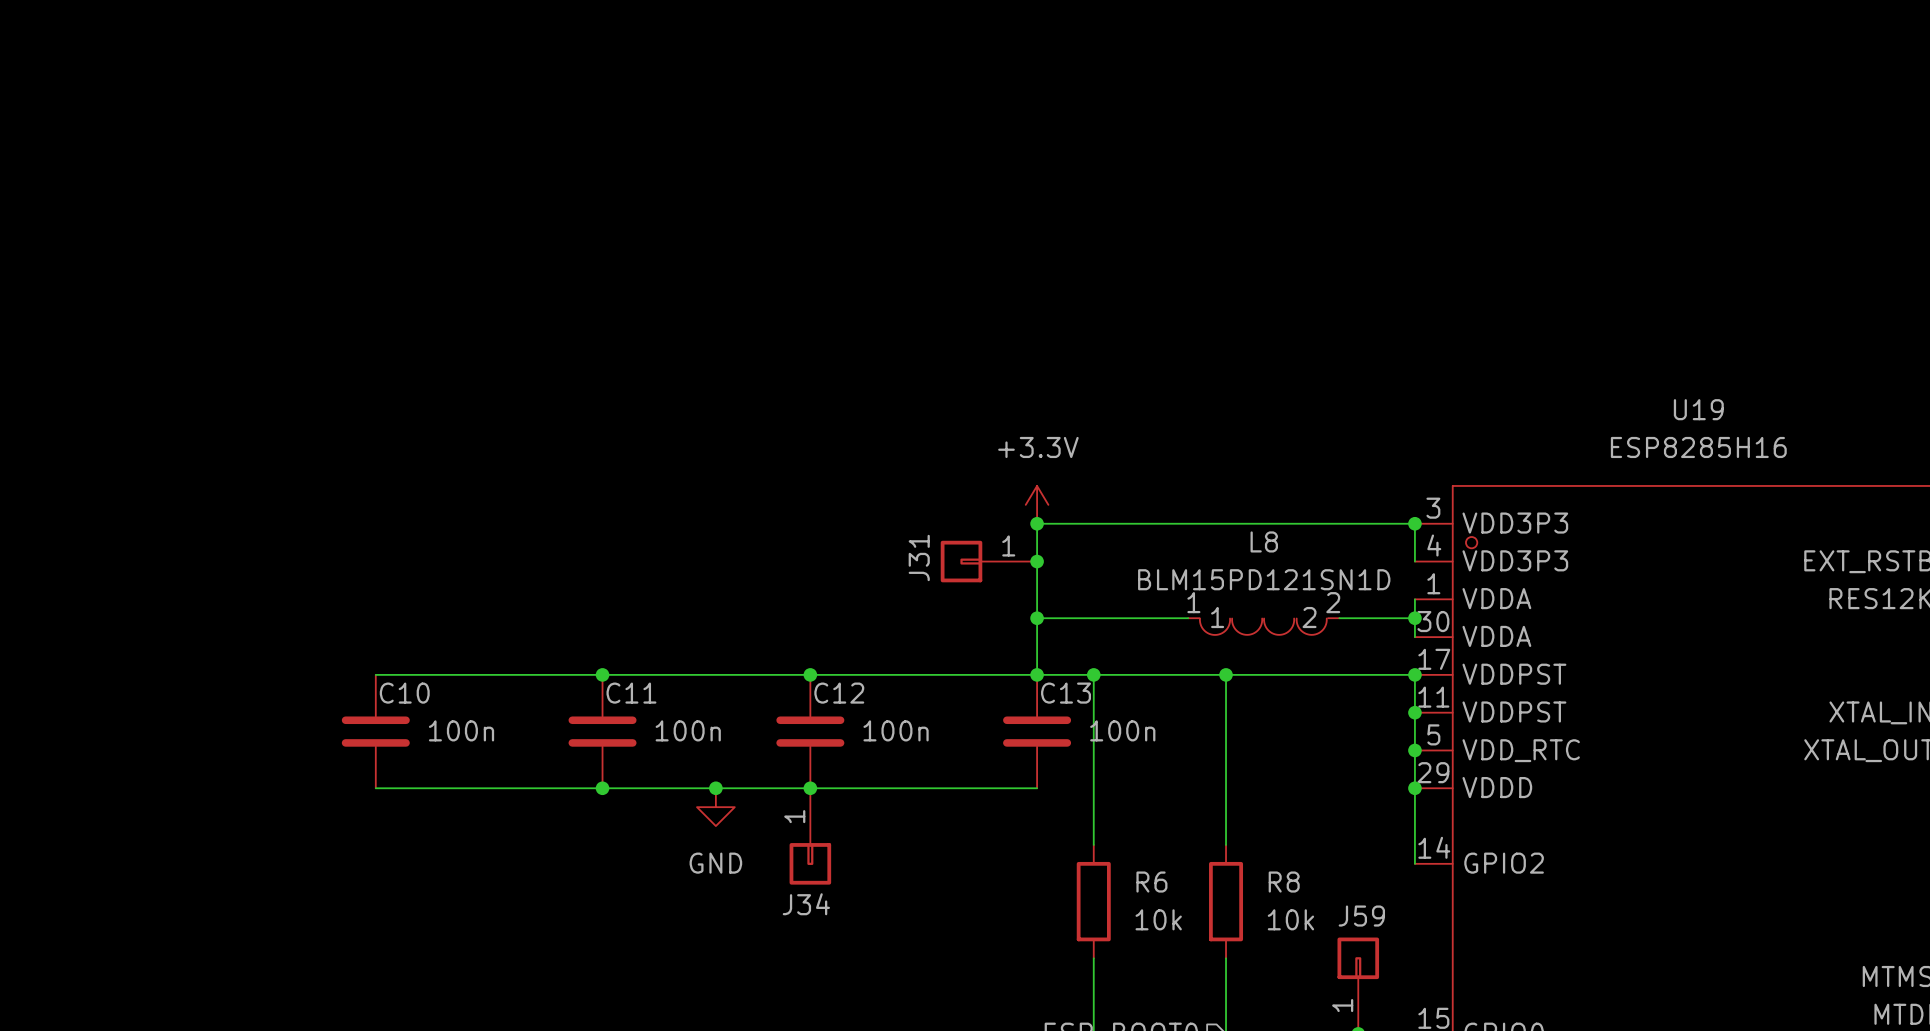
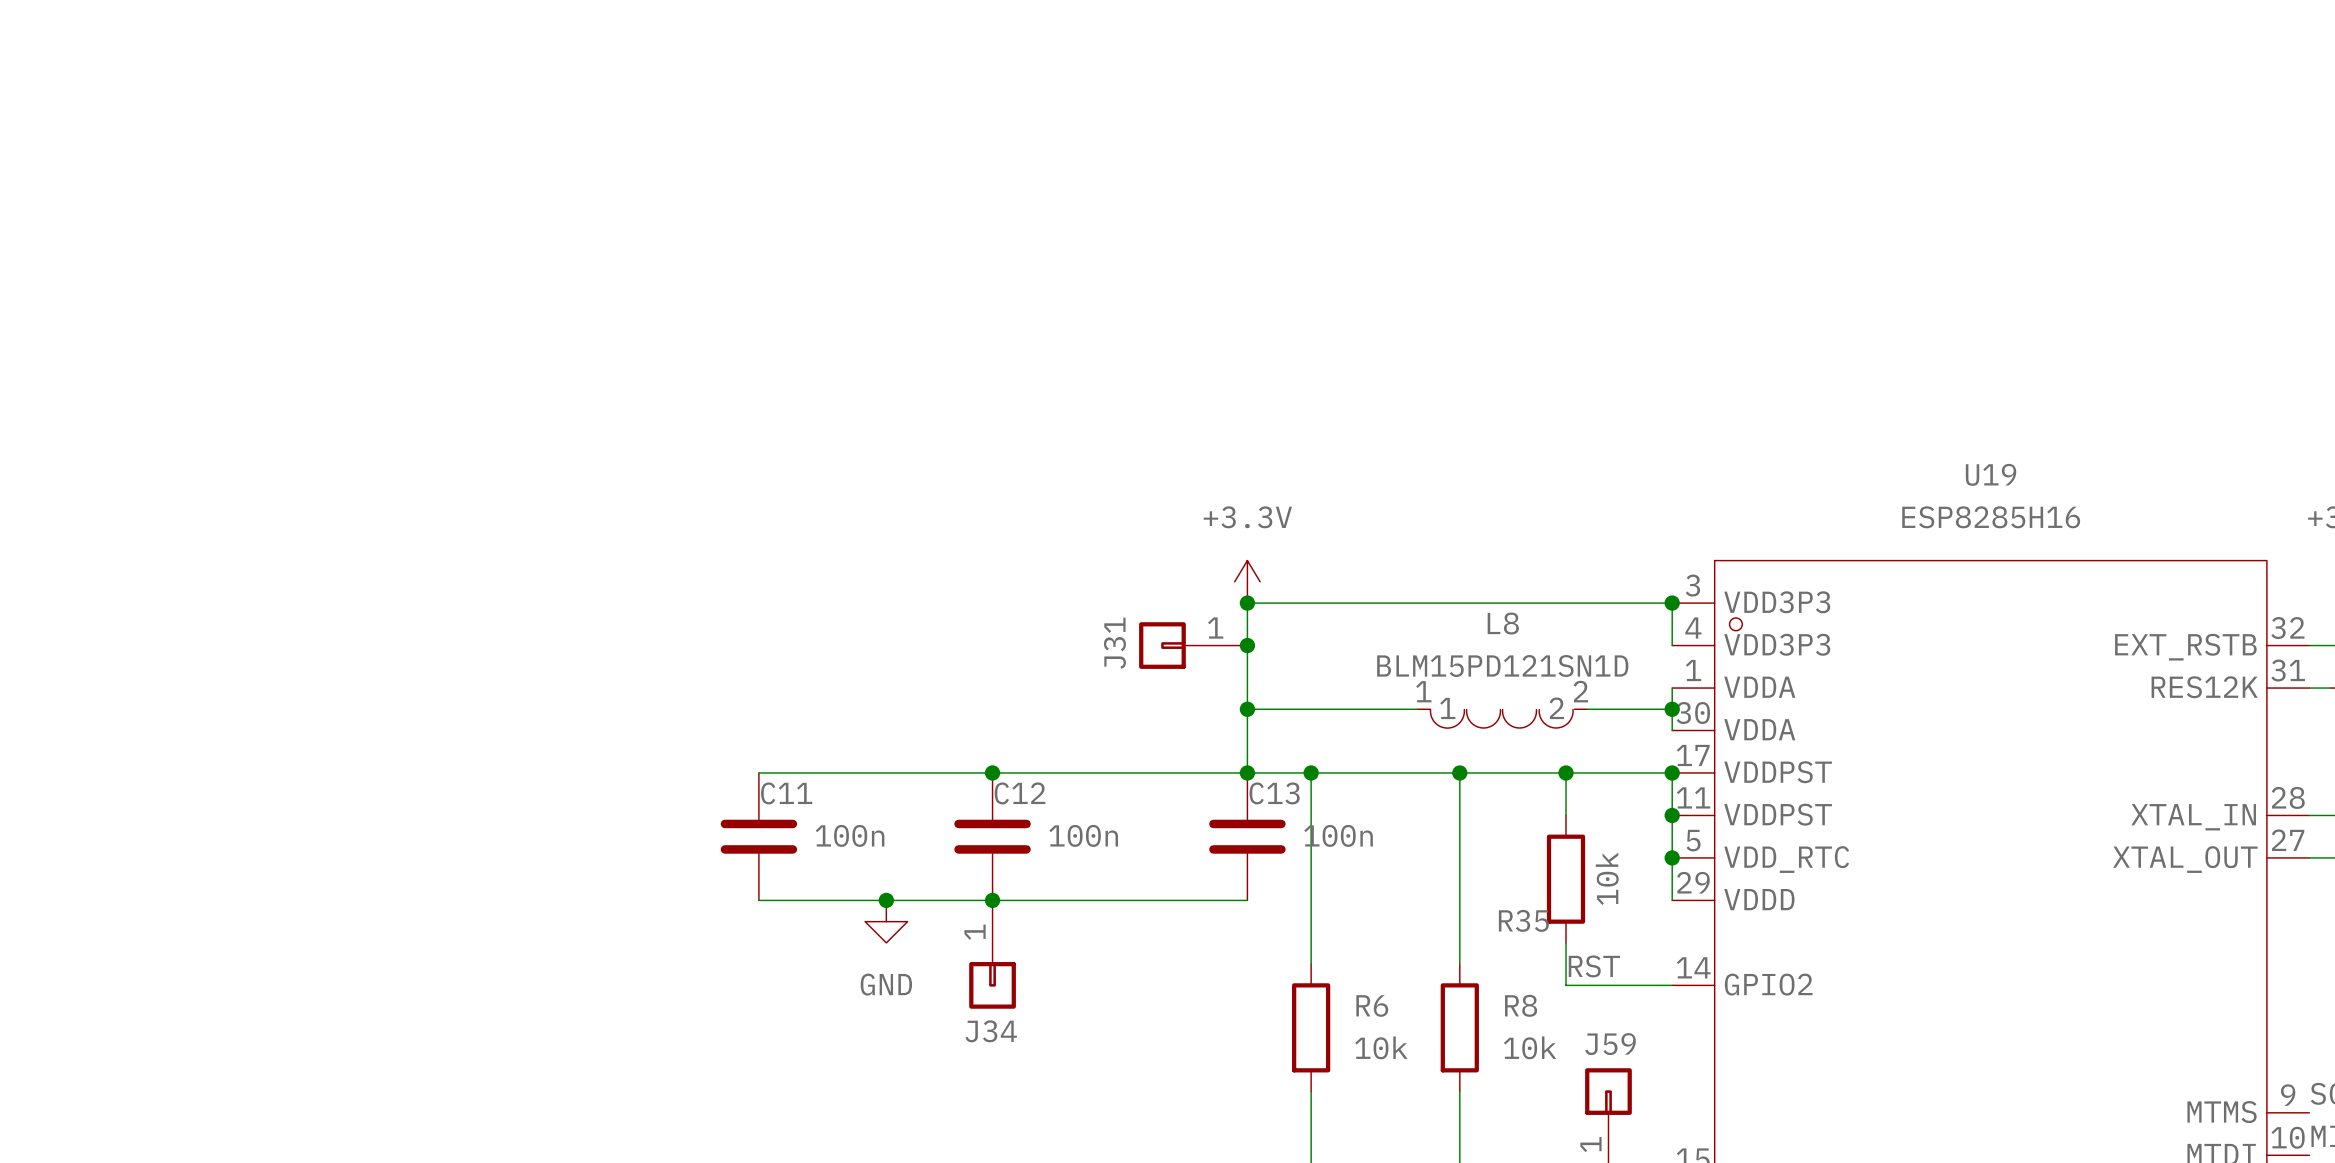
wire: (375, 674) (602, 674) -> none
junction: (602, 674) -> none
wire: none -> (1566, 772) (1566, 815)
junction: none -> (1566, 772)
C10: 100n (375, 731) -> none
R35: none -> 10k (1566, 879)
wire: (375, 788) (602, 788) -> none
junction: (602, 788) -> none
wire: (1414, 788) (1414, 863) -> (1566, 942) (1566, 985) (1672, 985)
junction: (1414, 788) -> none
label: none -> RST (1594, 966)

